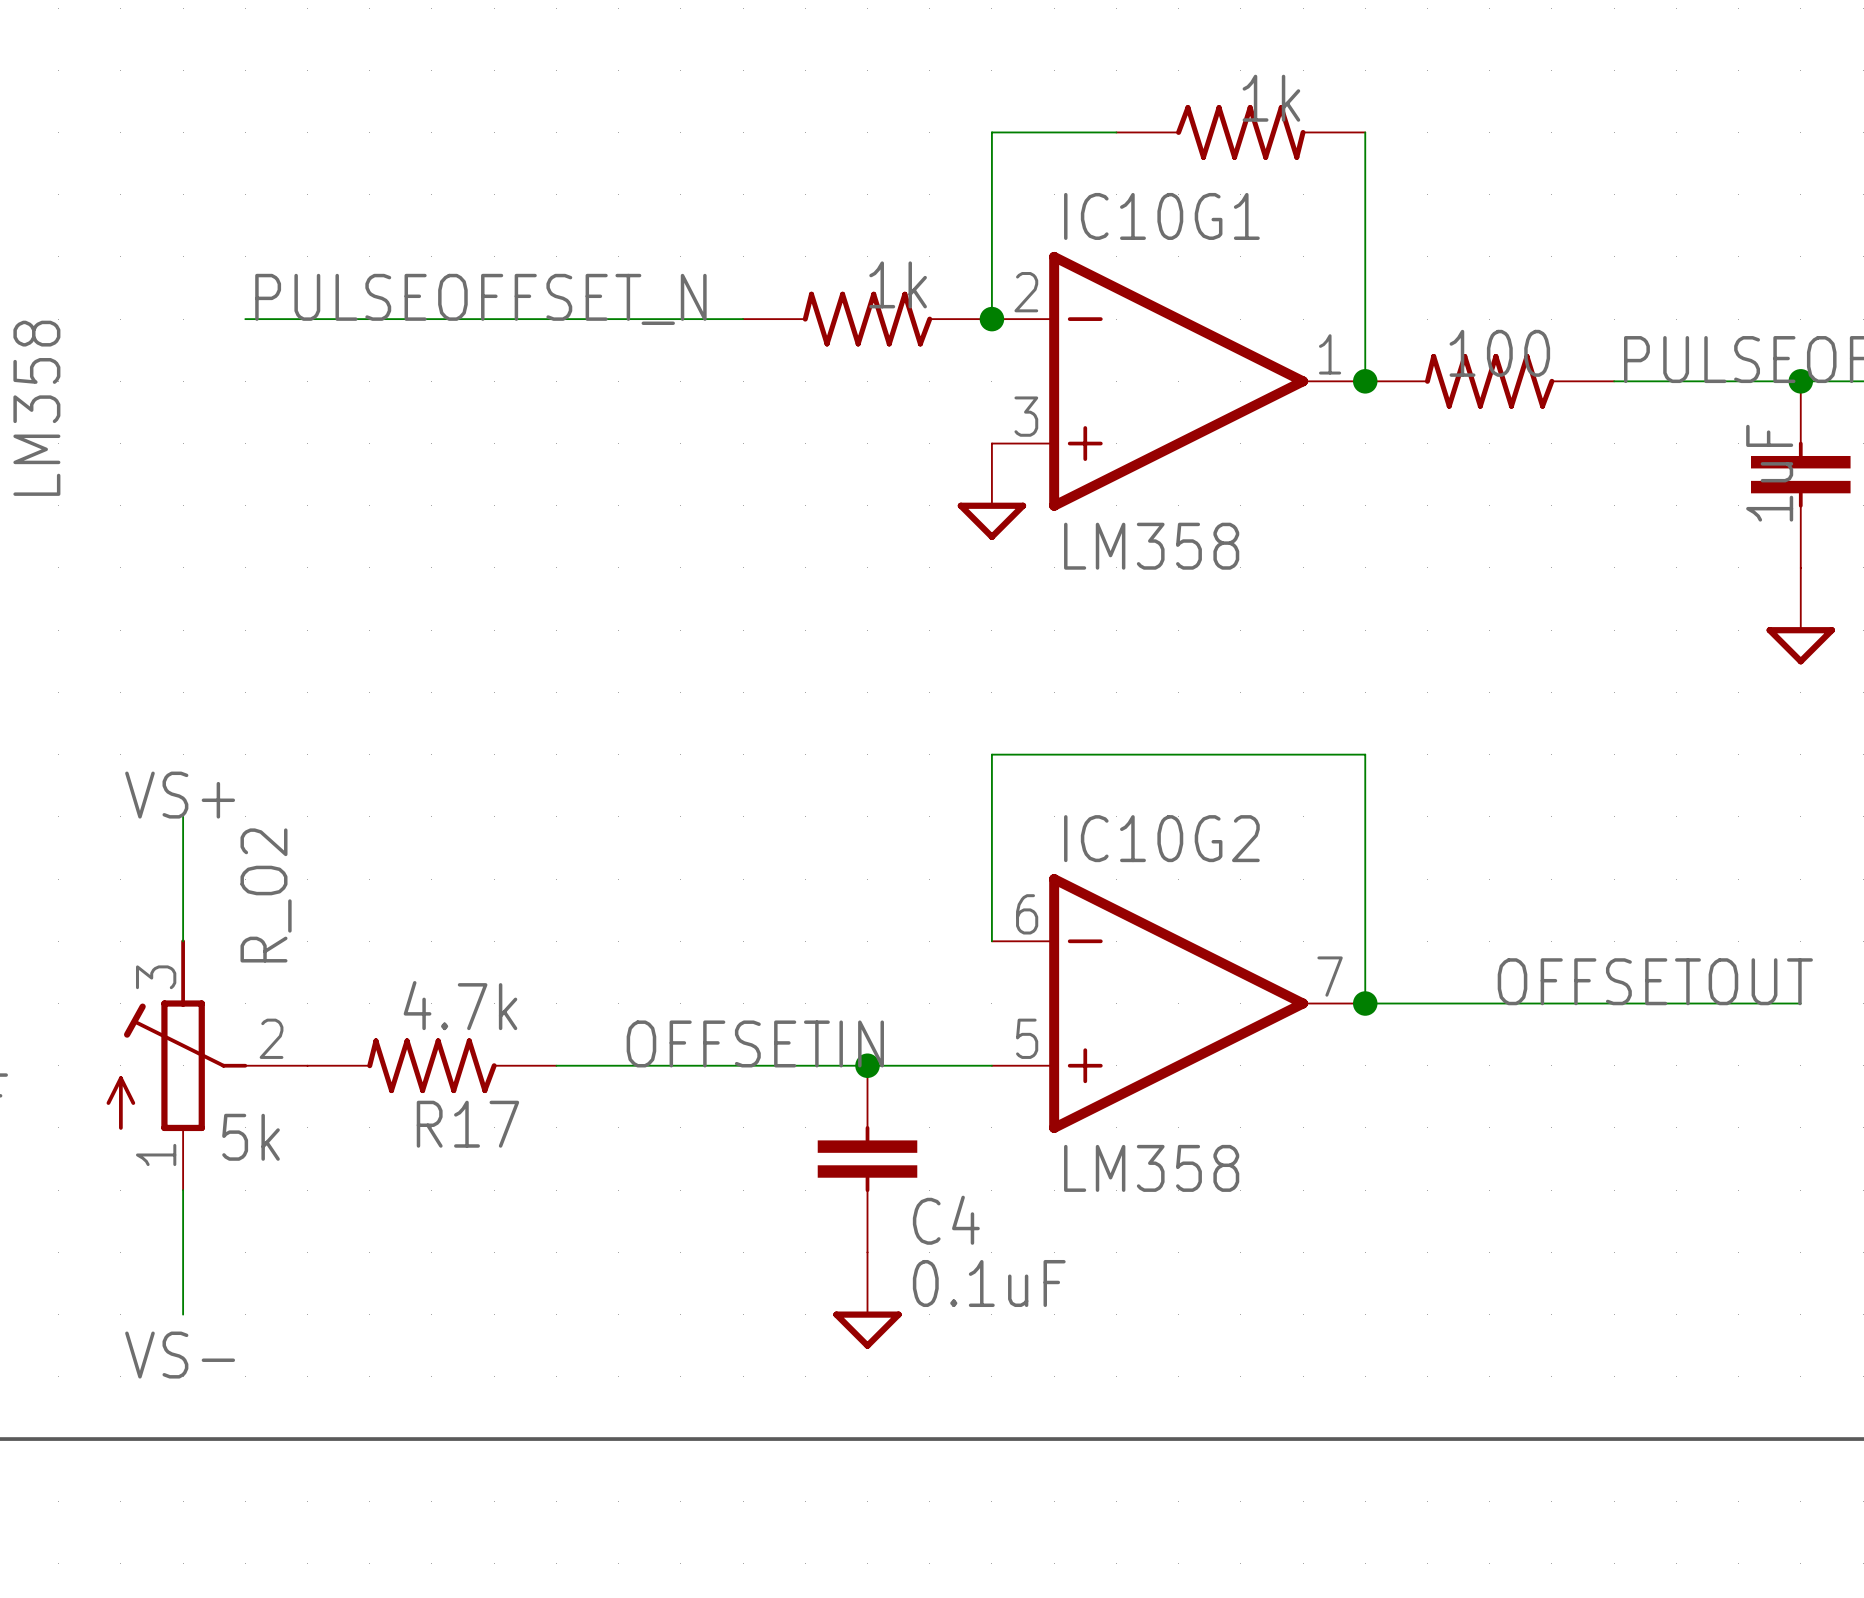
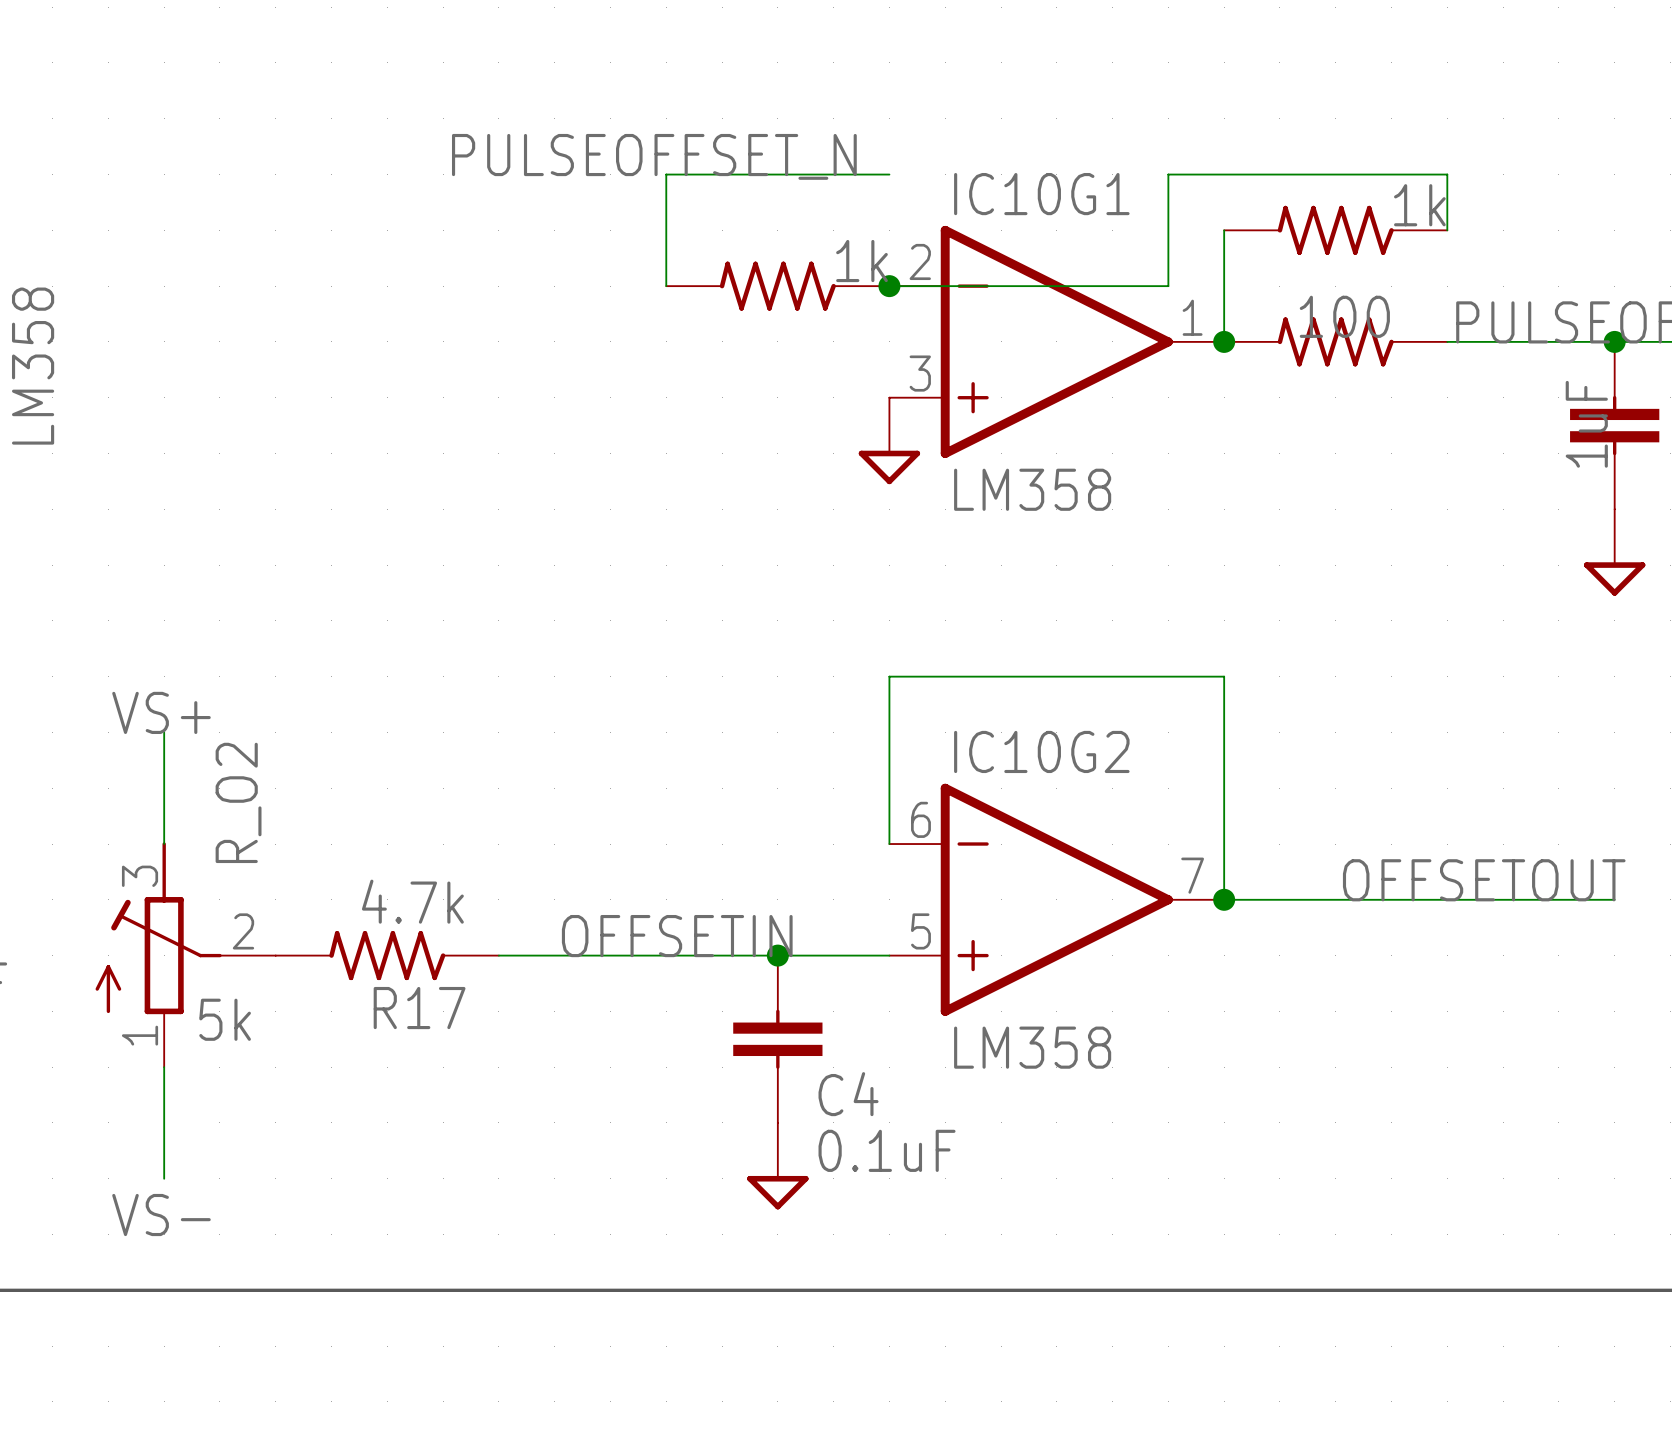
wire: (1116, 132) (991, 132) (991, 319) -> (1447, 230) (1447, 174) (1168, 174) (1168, 286) (889, 286)
part rotation: 0° (1240, 132) -> 180° (1335, 230)
part position: (1240, 132) -> (1335, 230)
wire: (1365, 132) (1365, 256) -> none
part value position: 1k (898, 284) -> 1k (861, 261)
label position: PULSEOFFSET_N (480, 299) -> PULSEOFFSET_N (654, 156)
wire: (245, 319) (743, 319) -> (889, 174) (666, 174) (666, 286)

